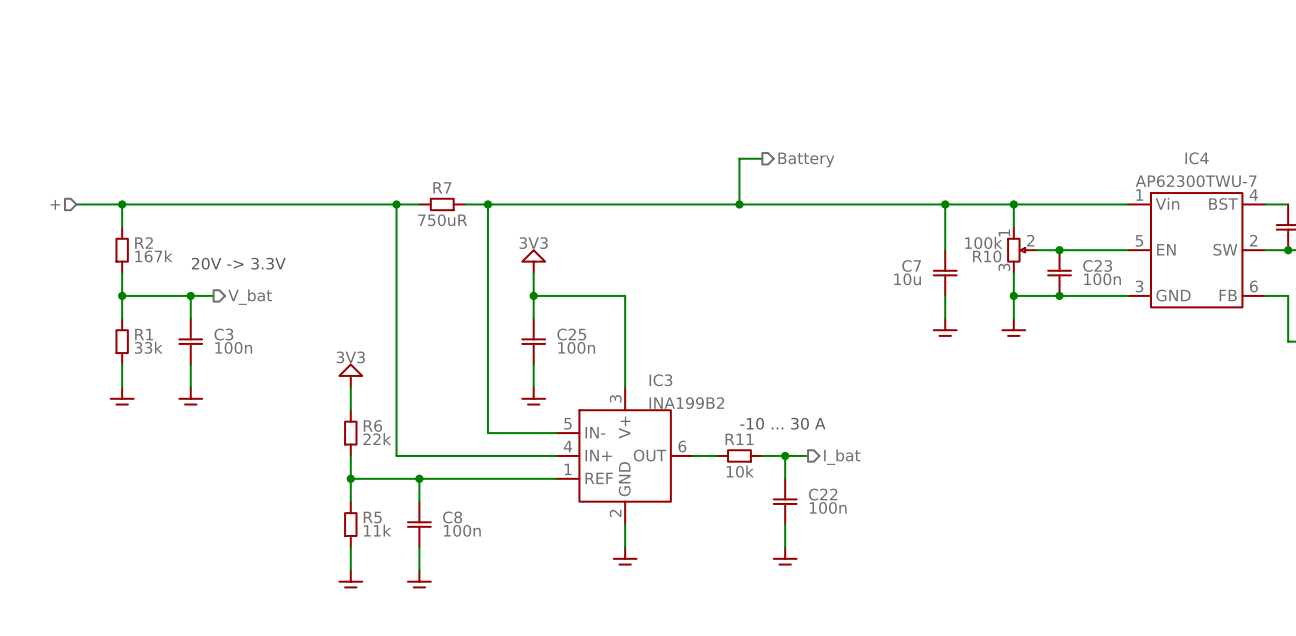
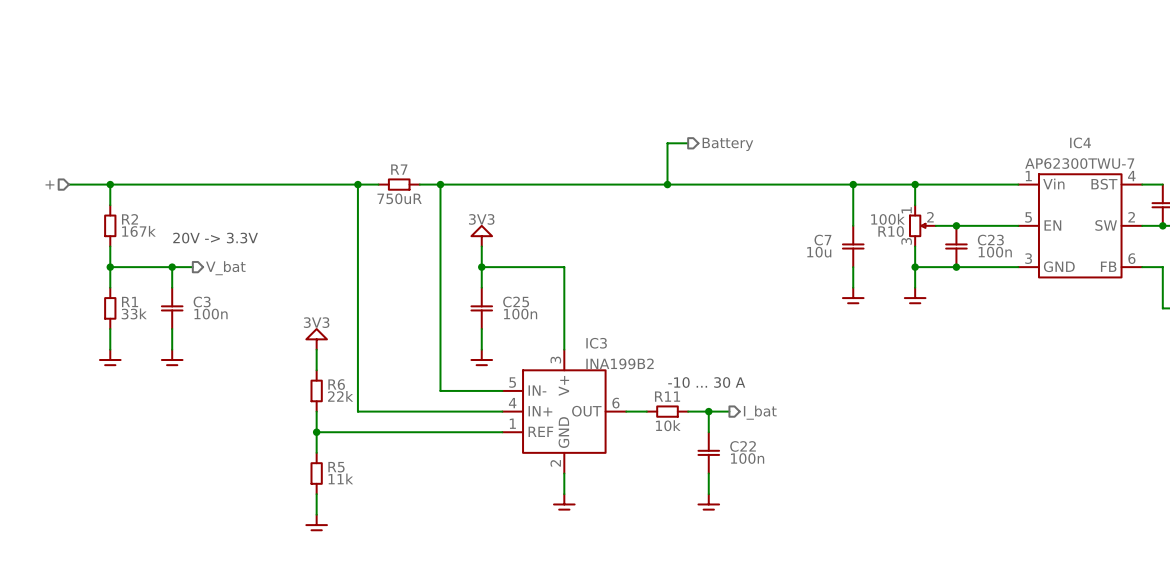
wire: (419, 478) (419, 501) -> none
junction: (419, 478) -> none
C8: 100n (419, 524) -> none
wire: (419, 547) (419, 570) -> none
power symbol: (419, 581) -> none

